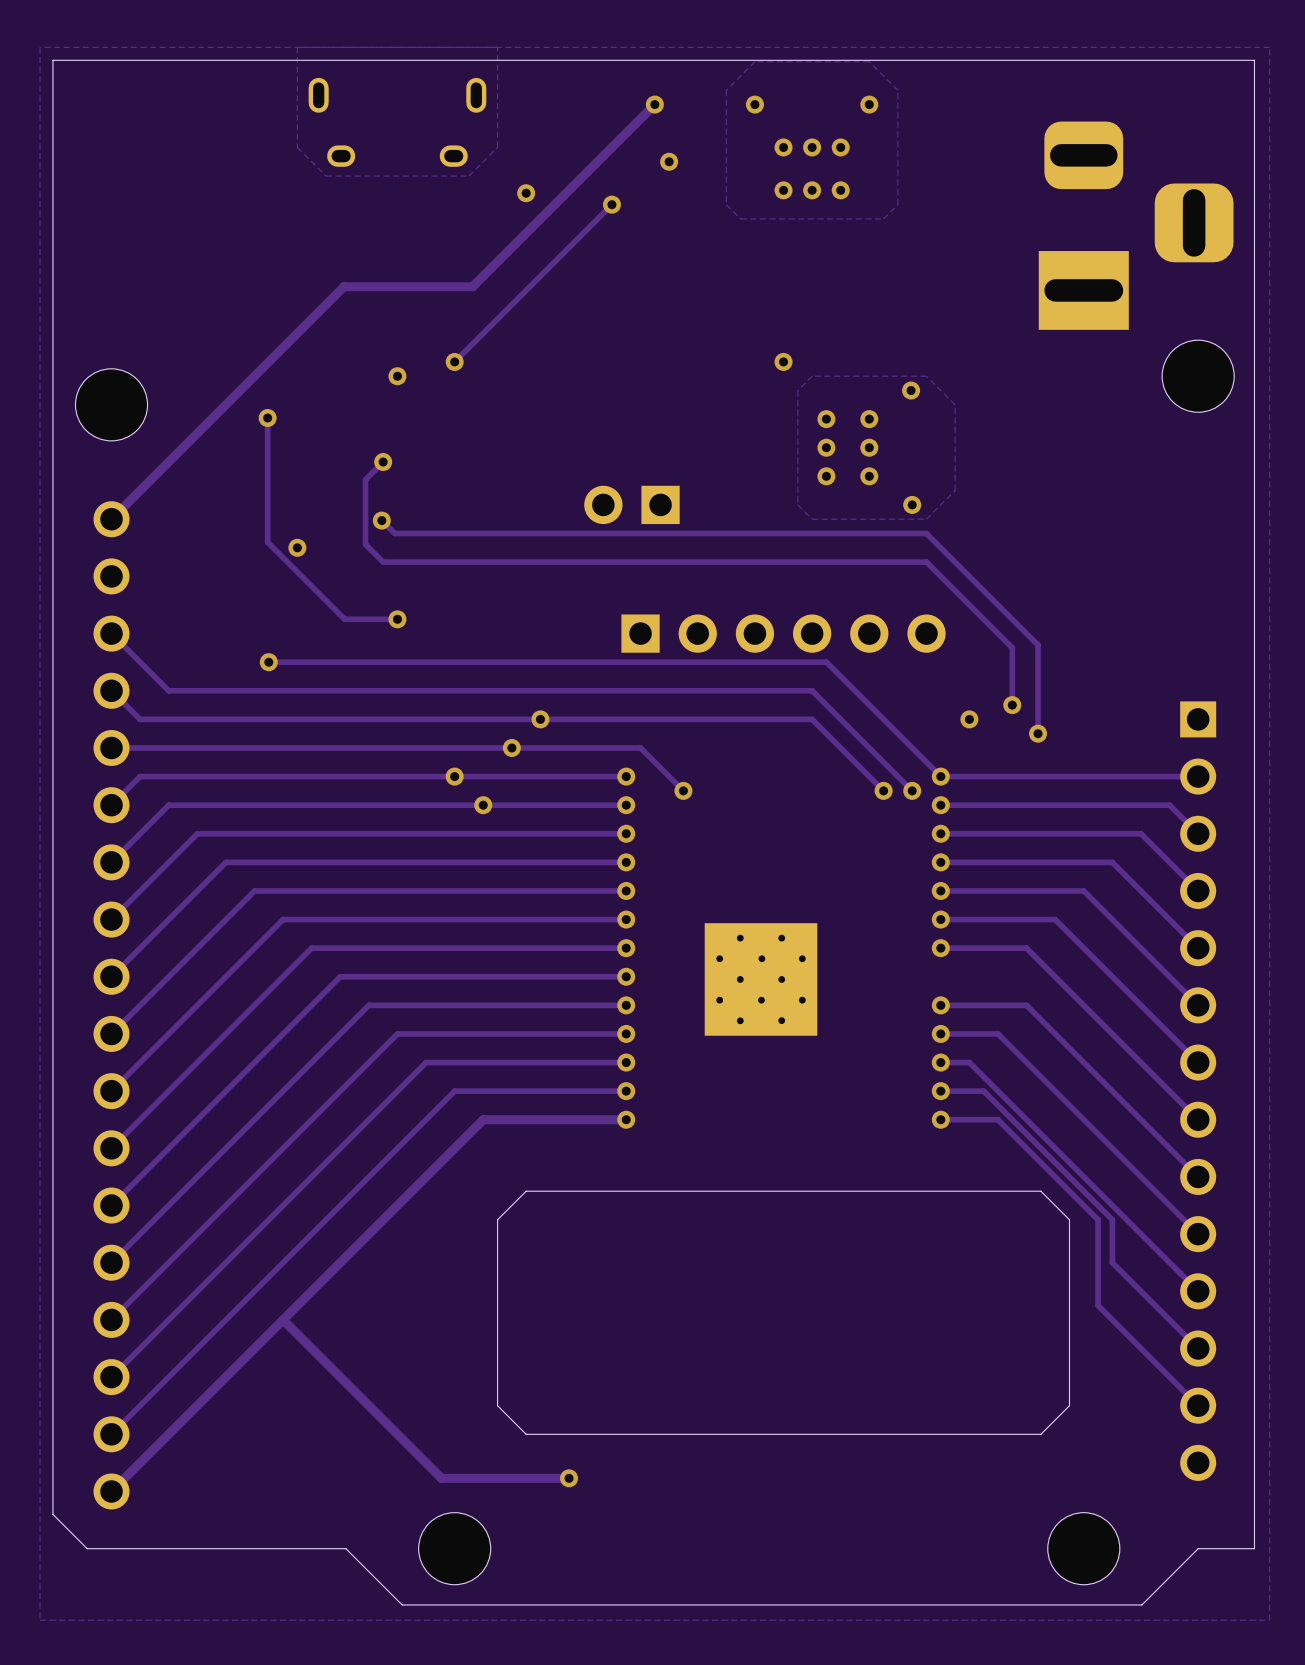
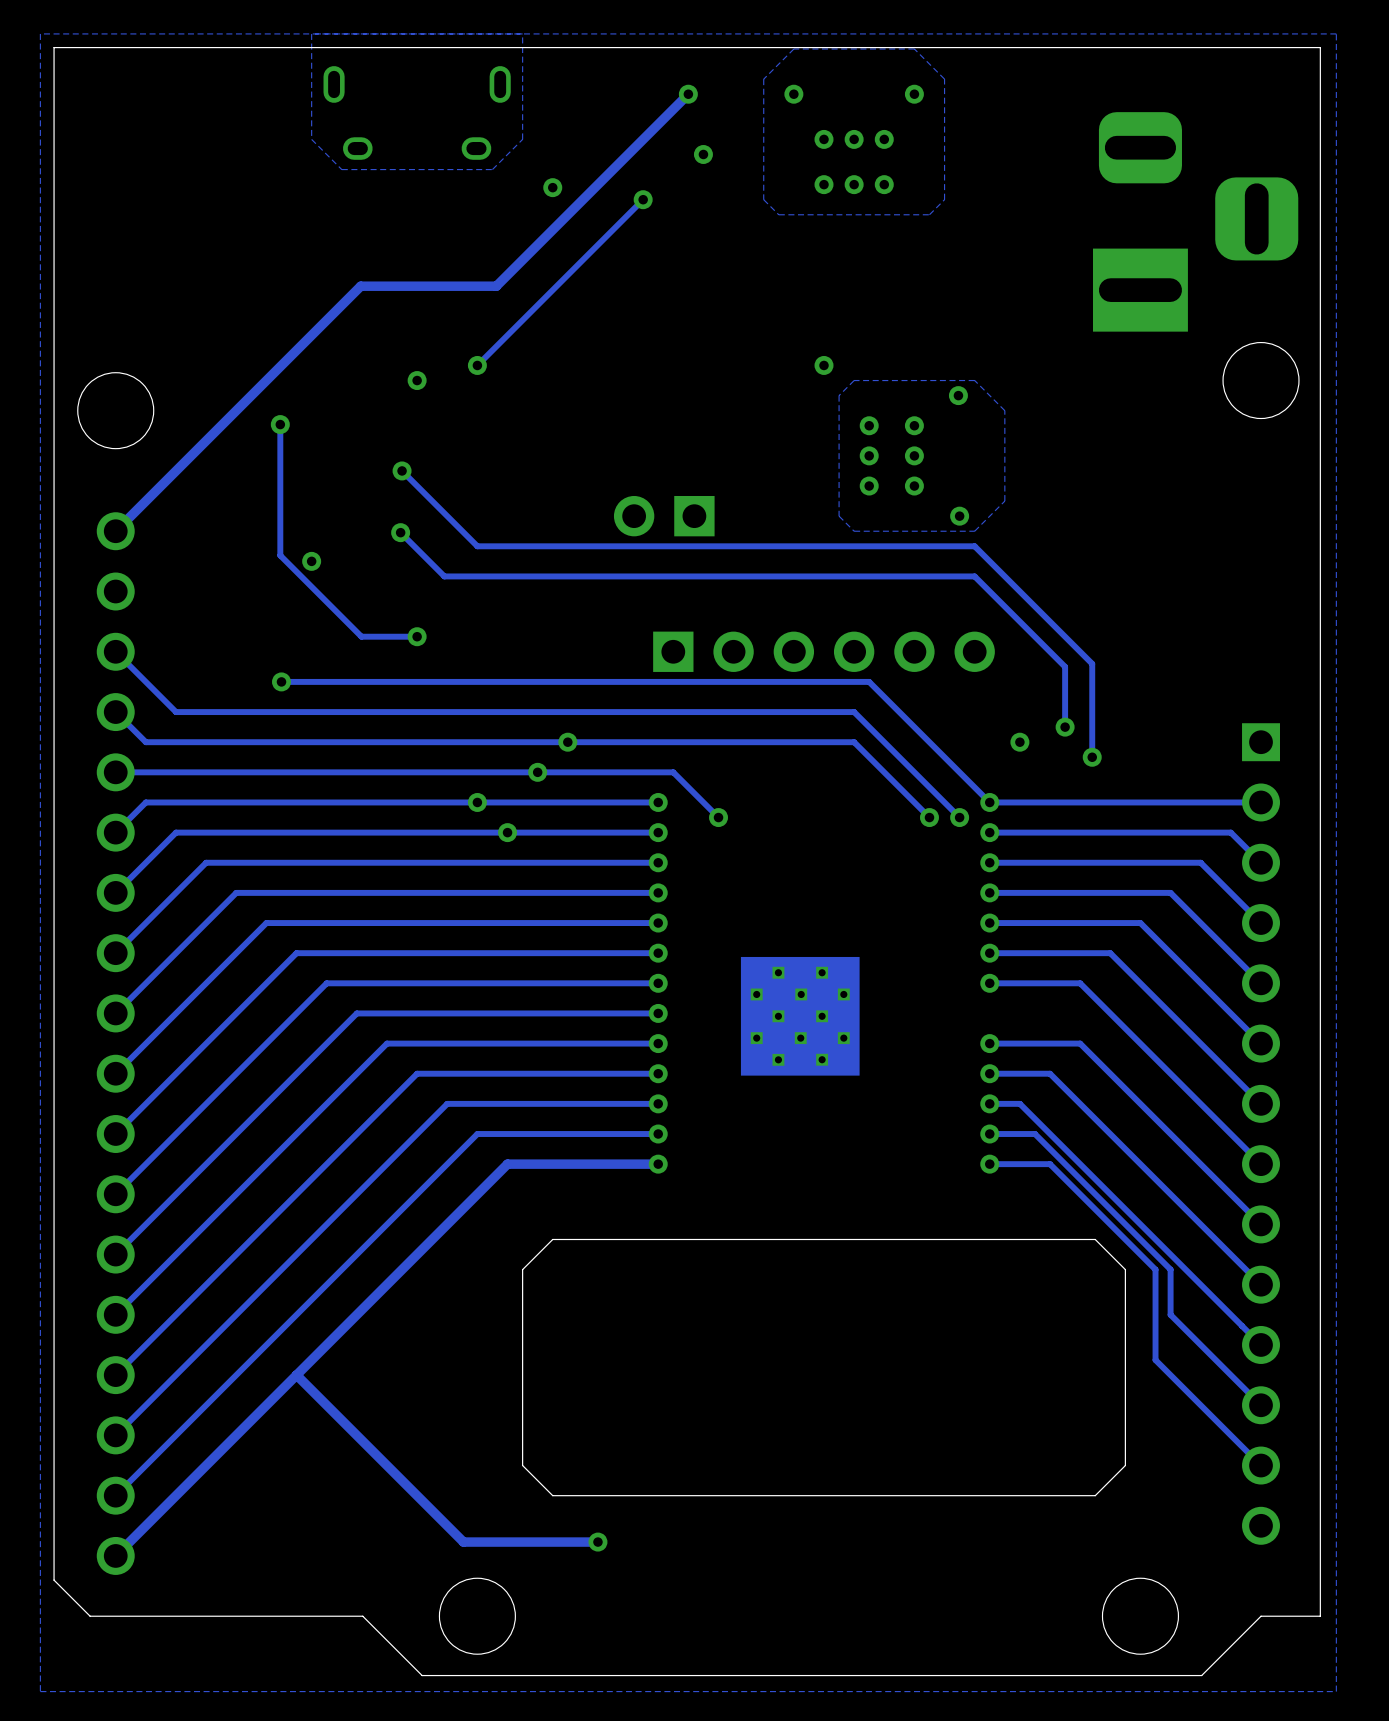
track: (383, 462) (365, 479) (365, 544) (383, 562) (423, 562) -> (402, 470) (477, 546)
track: (454, 533) (394, 533) -> (444, 576) (414, 546)

